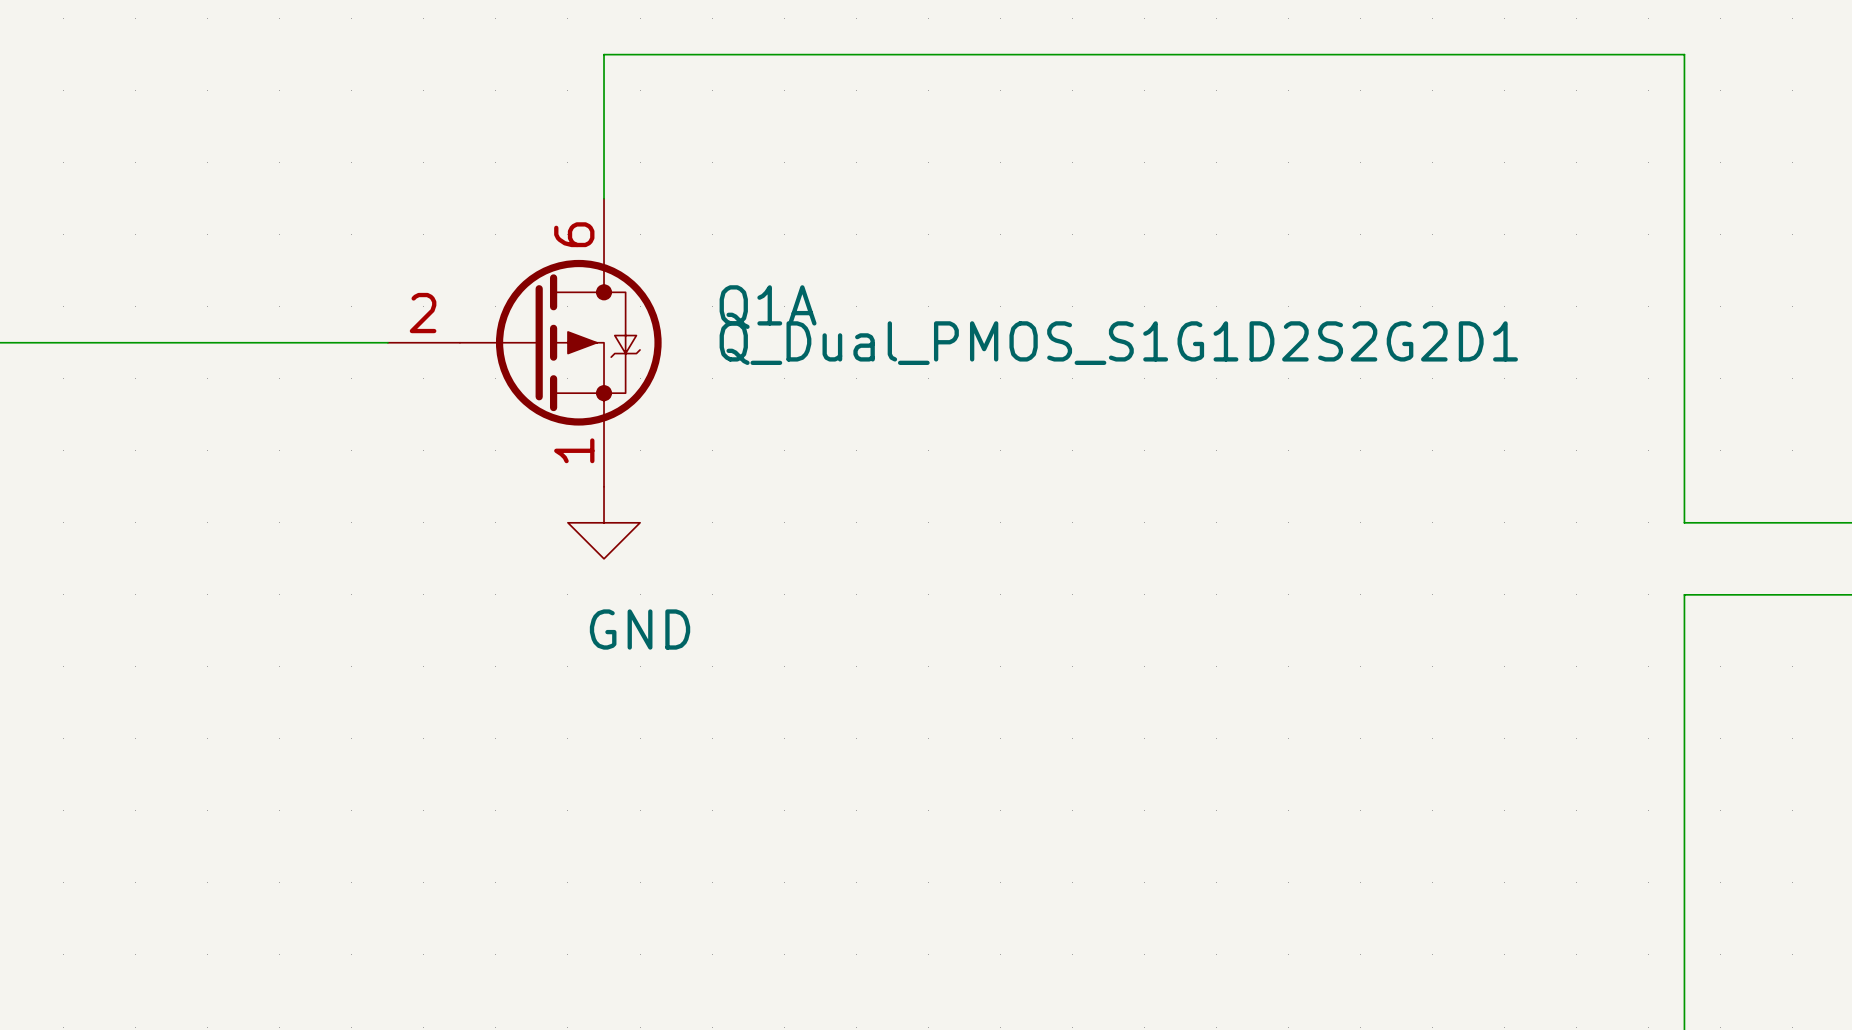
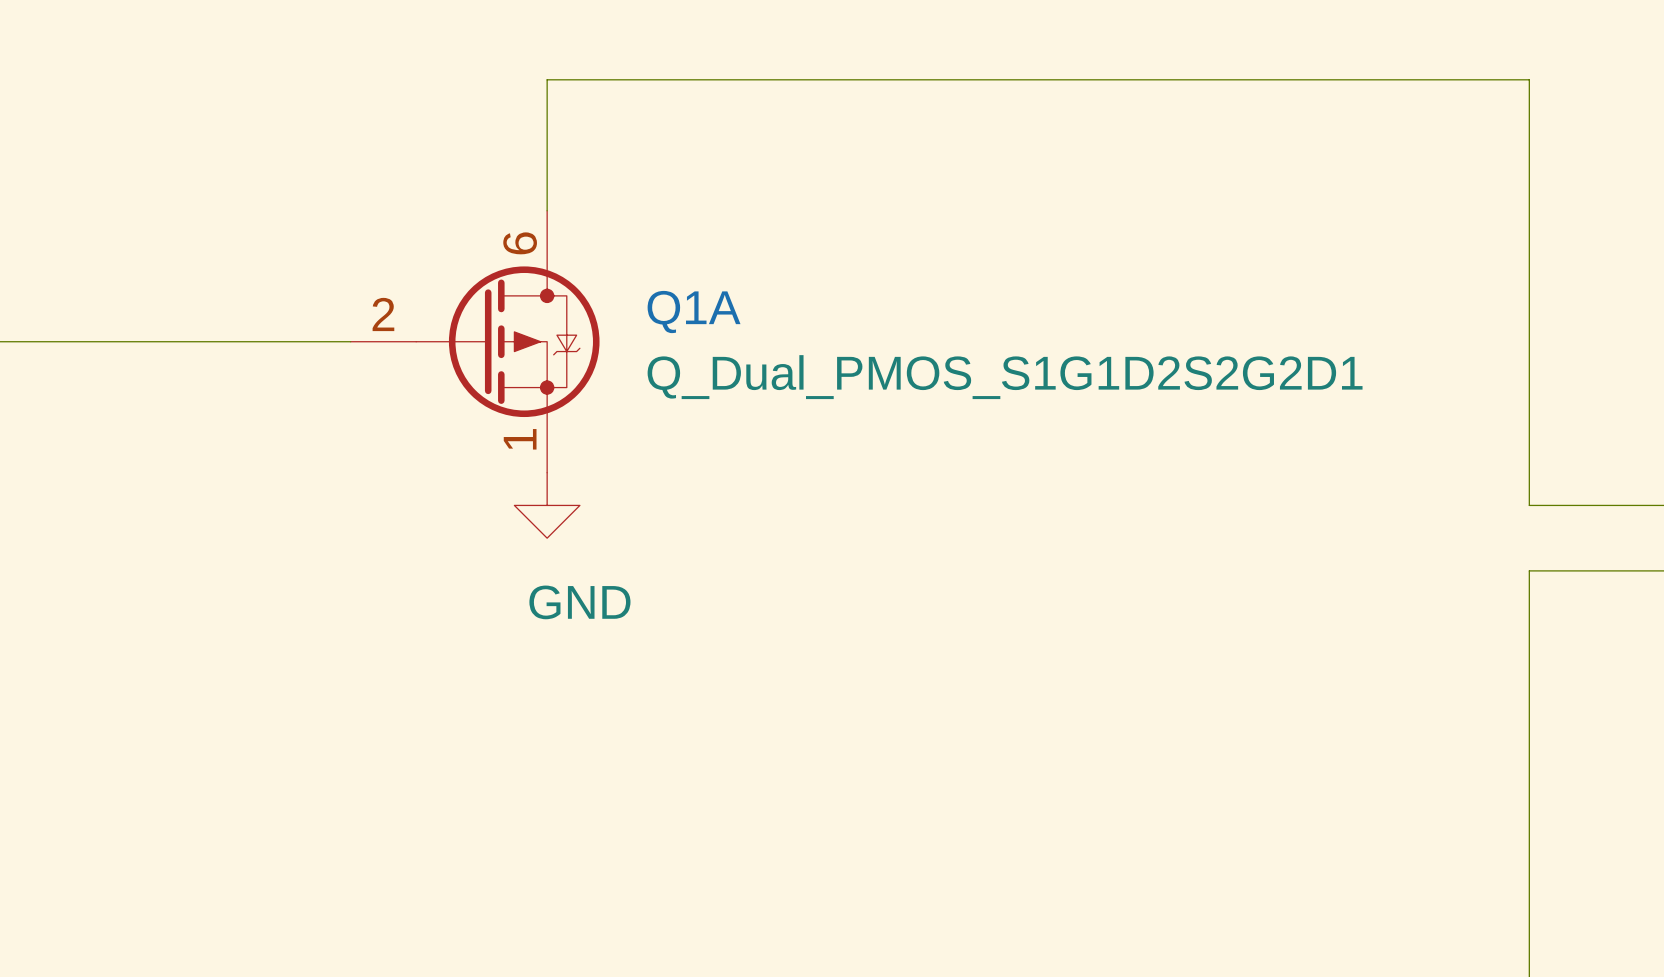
Q1A value position: Q_Dual_PMOS_S1G1D2S2G2D1 (1118, 343) -> Q_Dual_PMOS_S1G1D2S2G2D1 (1005, 377)

